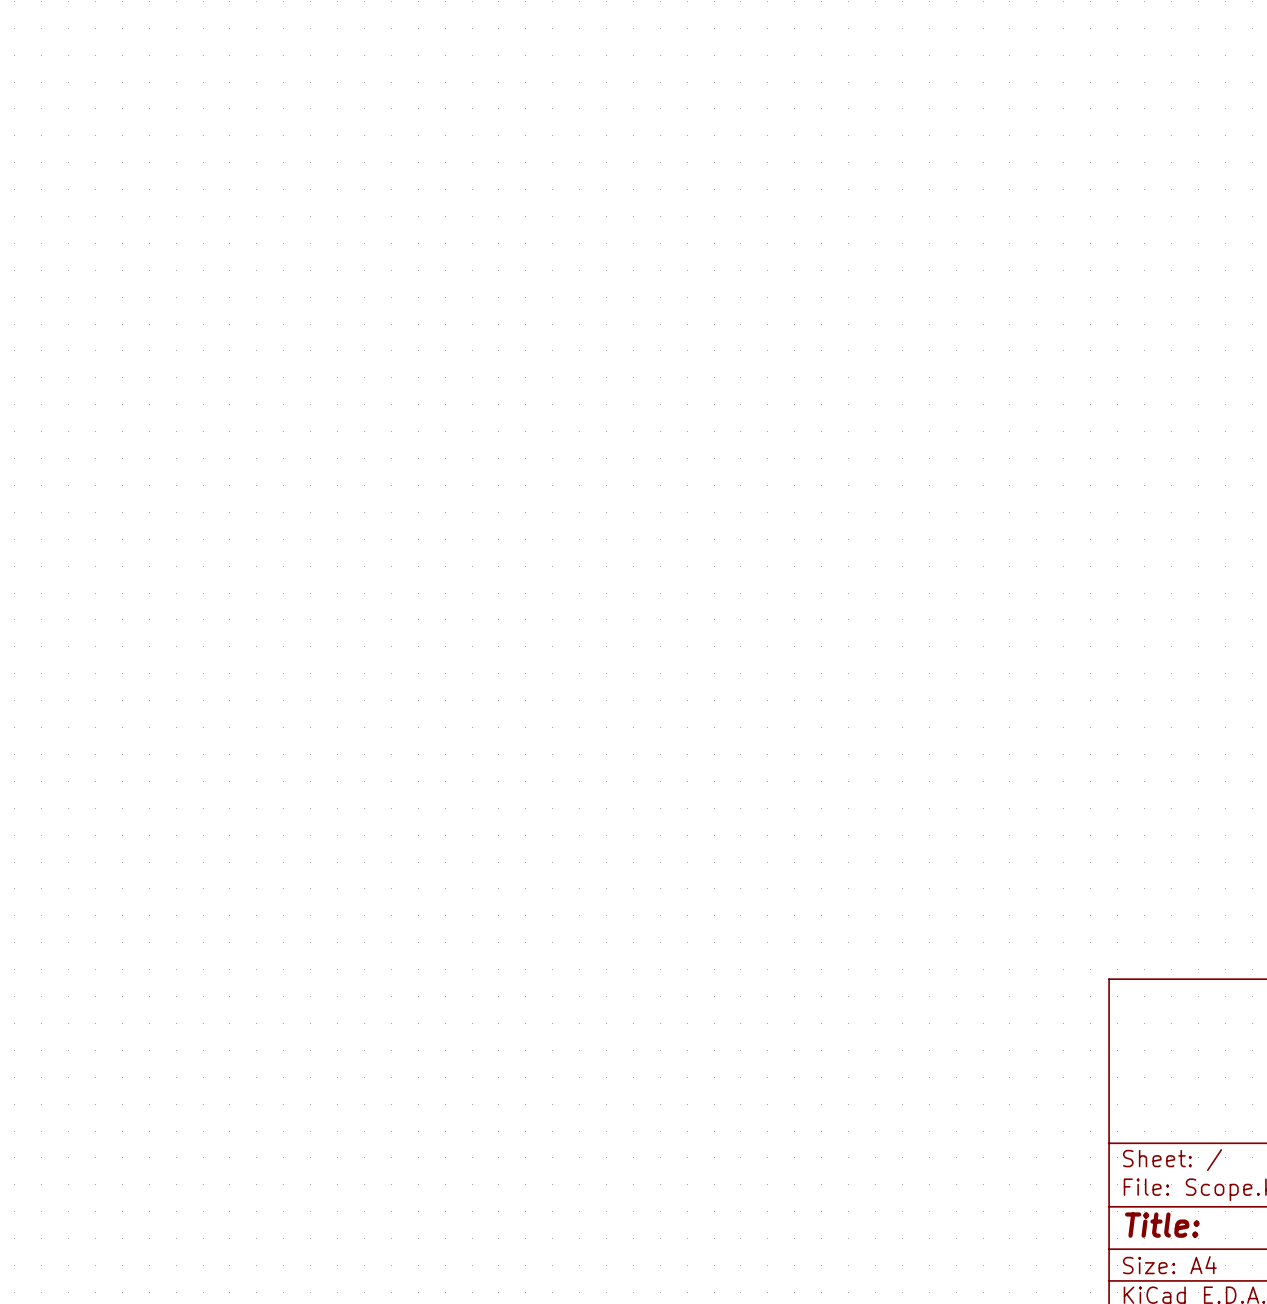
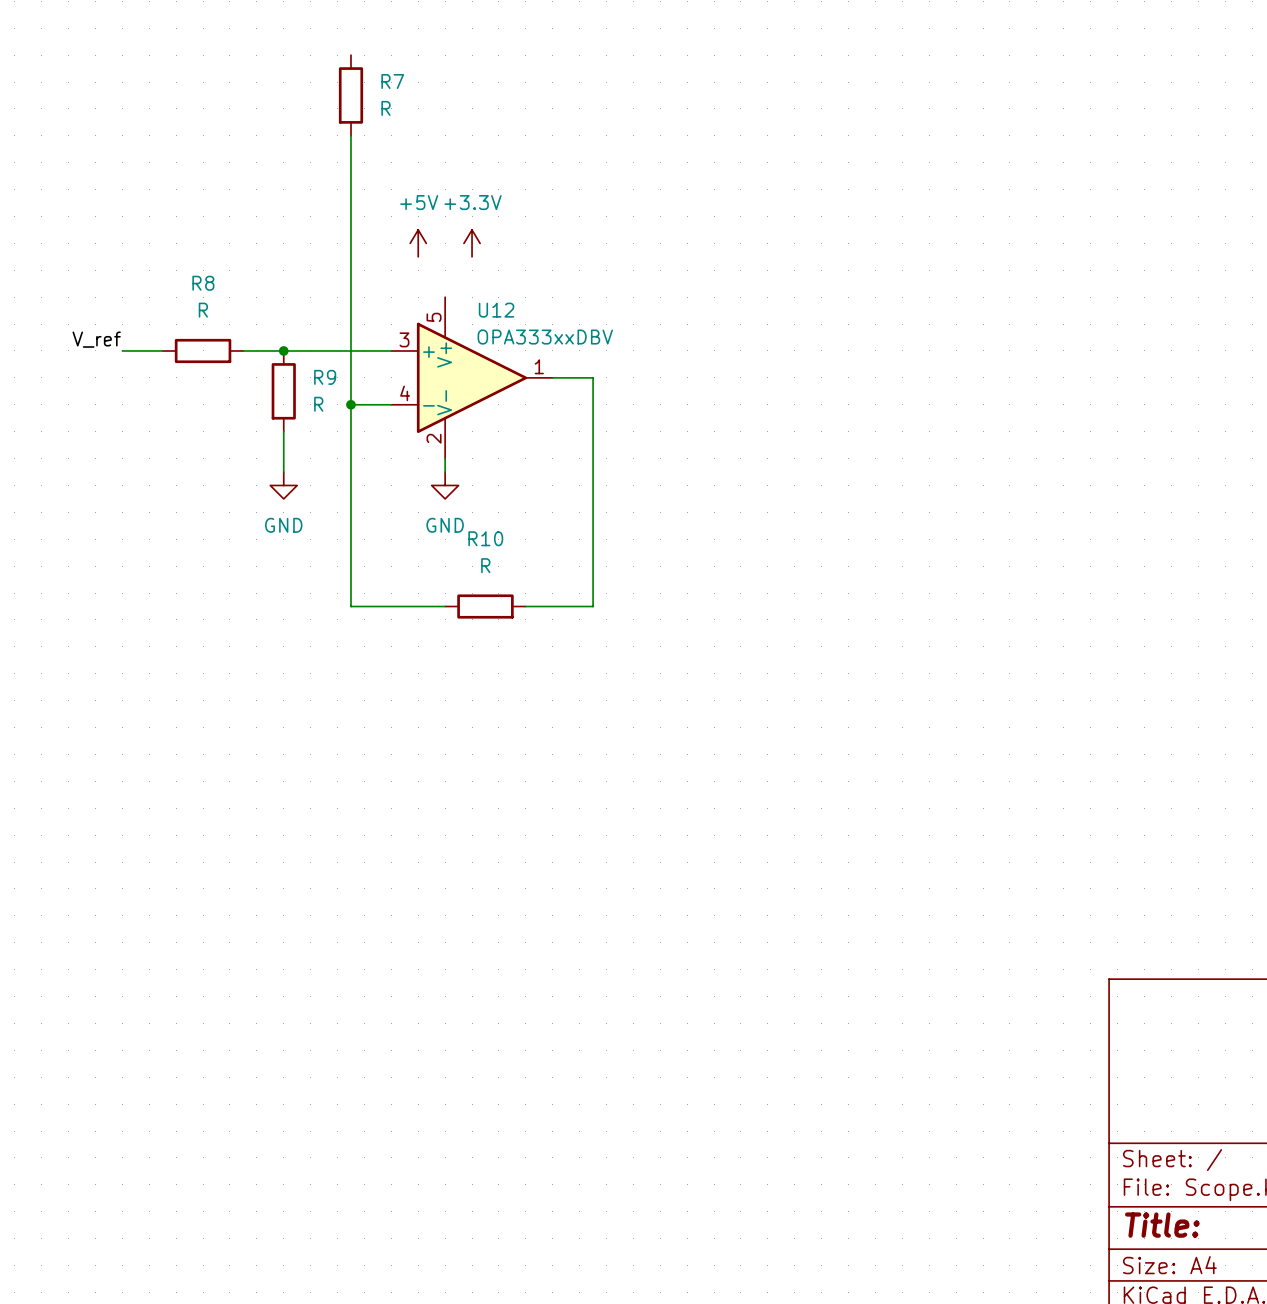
R7: none -> R (350, 95)
wire: none -> (350, 135) (350, 606) (445, 606)
power symbol: none -> +5V (418, 243)
power symbol: none -> +3.3V (472, 243)
label: none -> V_ref (96, 339)
wire: none -> (122, 350) (162, 350)
R8: none -> R (203, 350)
wire: none -> (243, 350) (391, 350)
junction: none -> (283, 350)
U12: none -> OPA333xxDBV (472, 377)
wire: none -> (552, 377) (593, 377) (593, 606) (525, 606)
R9: none -> R (283, 391)
wire: none -> (350, 404) (391, 404)
junction: none -> (350, 404)
wire: none -> (283, 431) (283, 472)
wire: none -> (445, 458) (445, 472)
power symbol: none -> GND (283, 485)
power symbol: none -> GND (445, 485)
R10: none -> R (485, 606)

